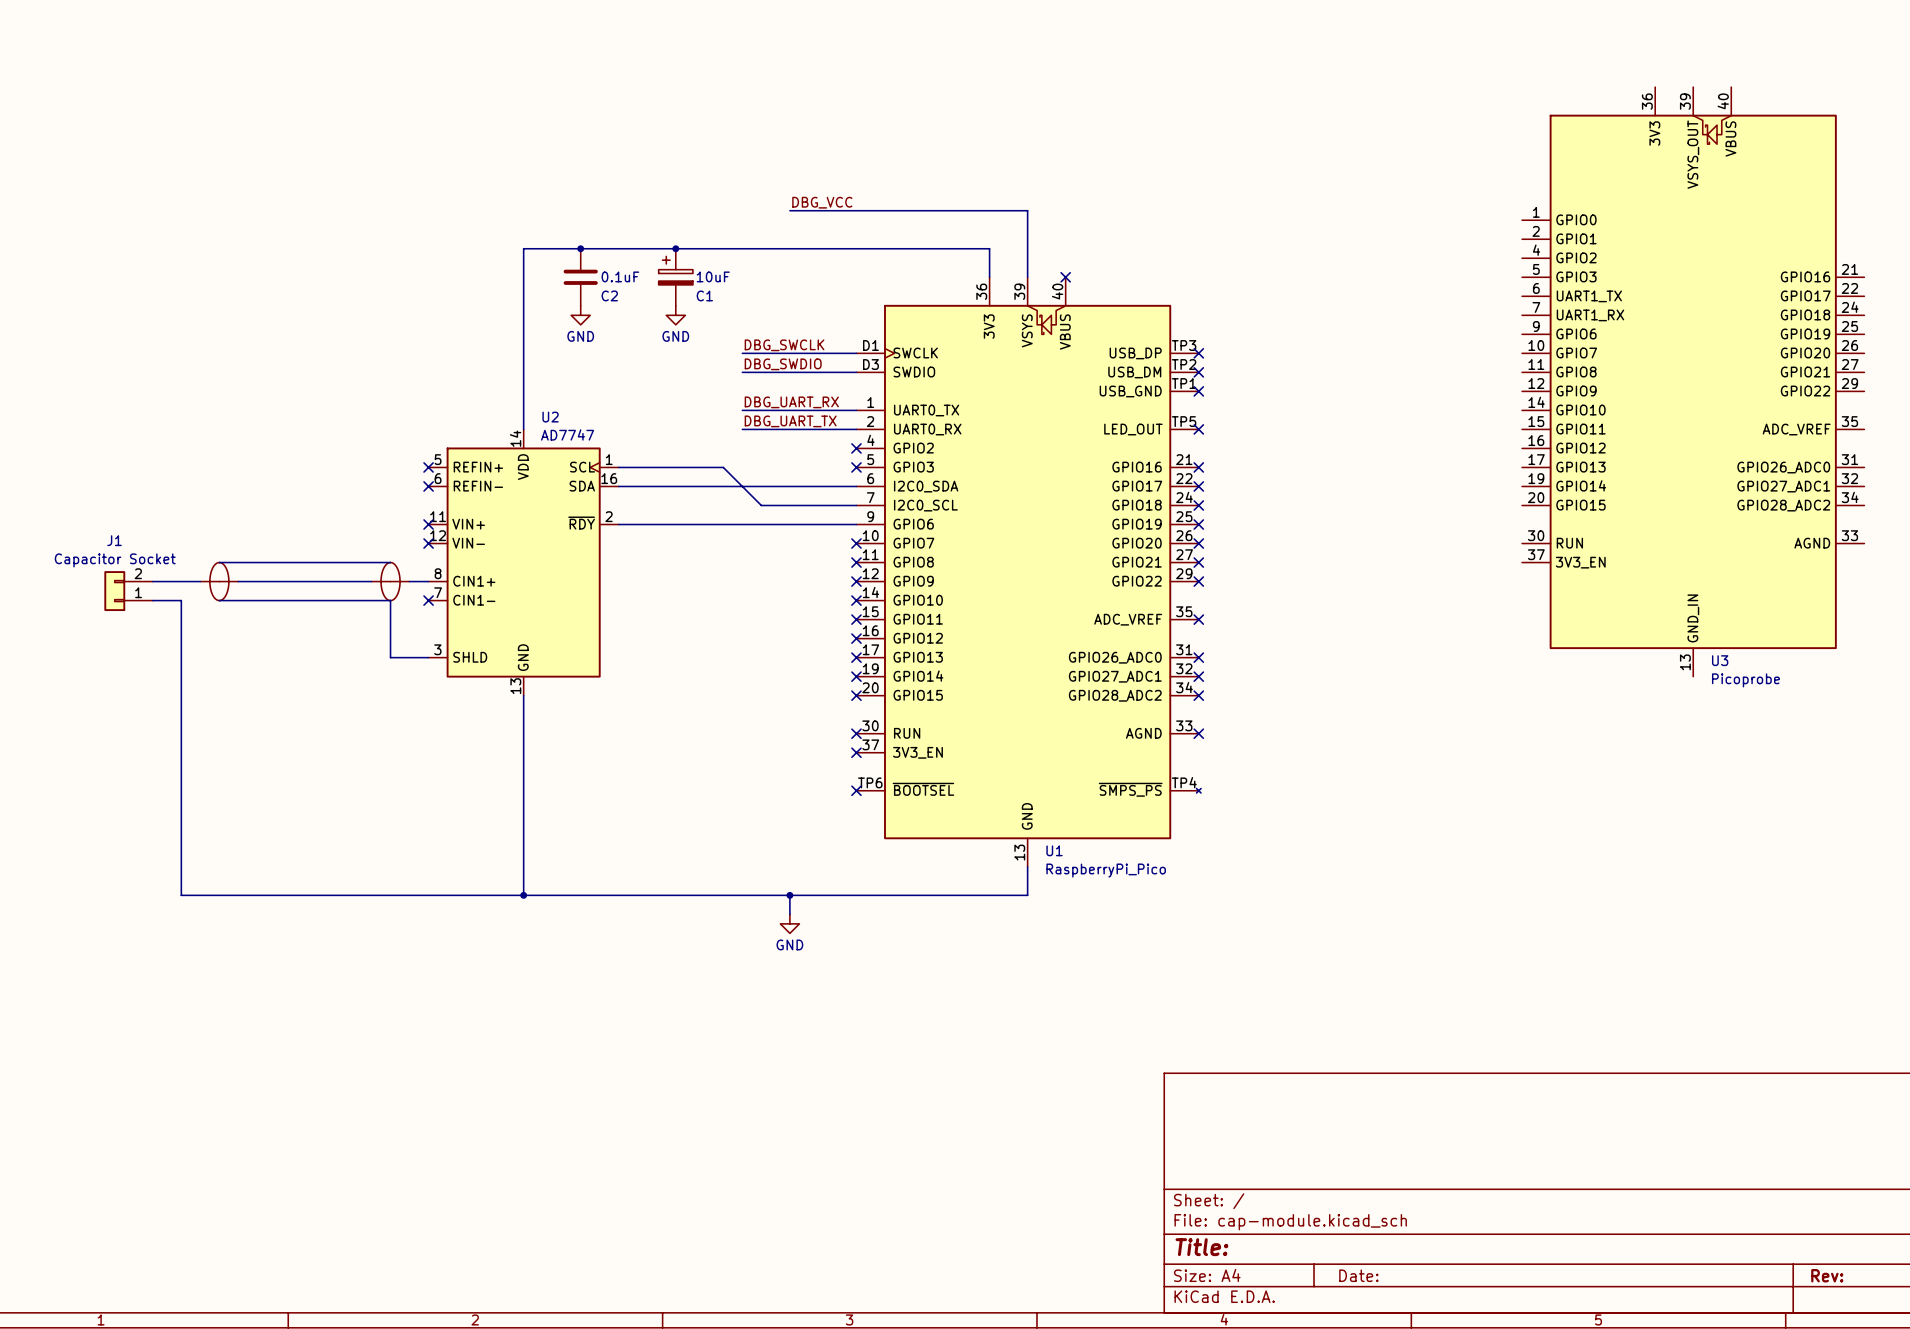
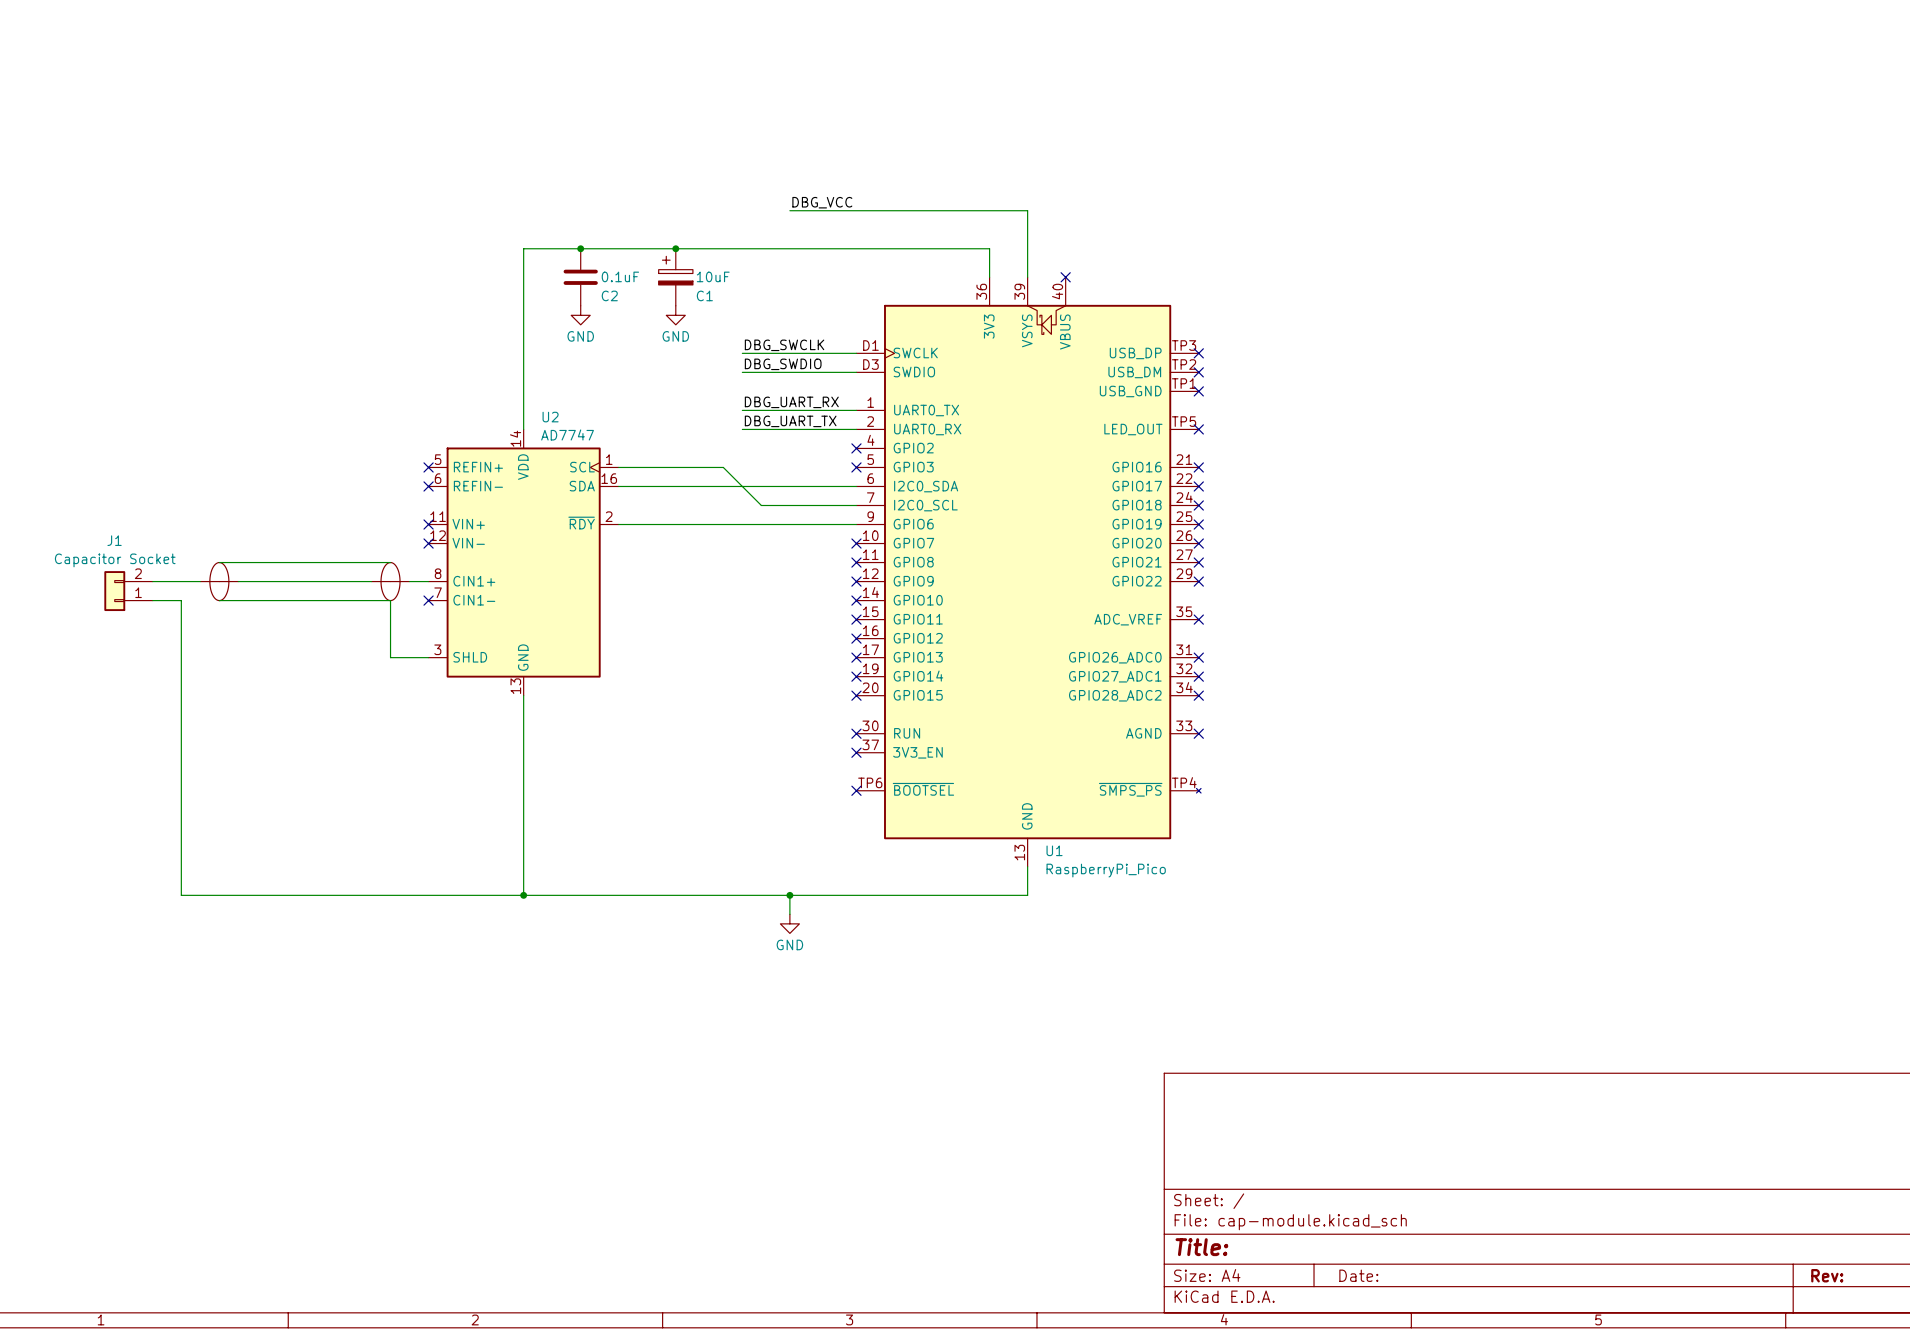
U3: Picoprobe (1693, 381) -> none

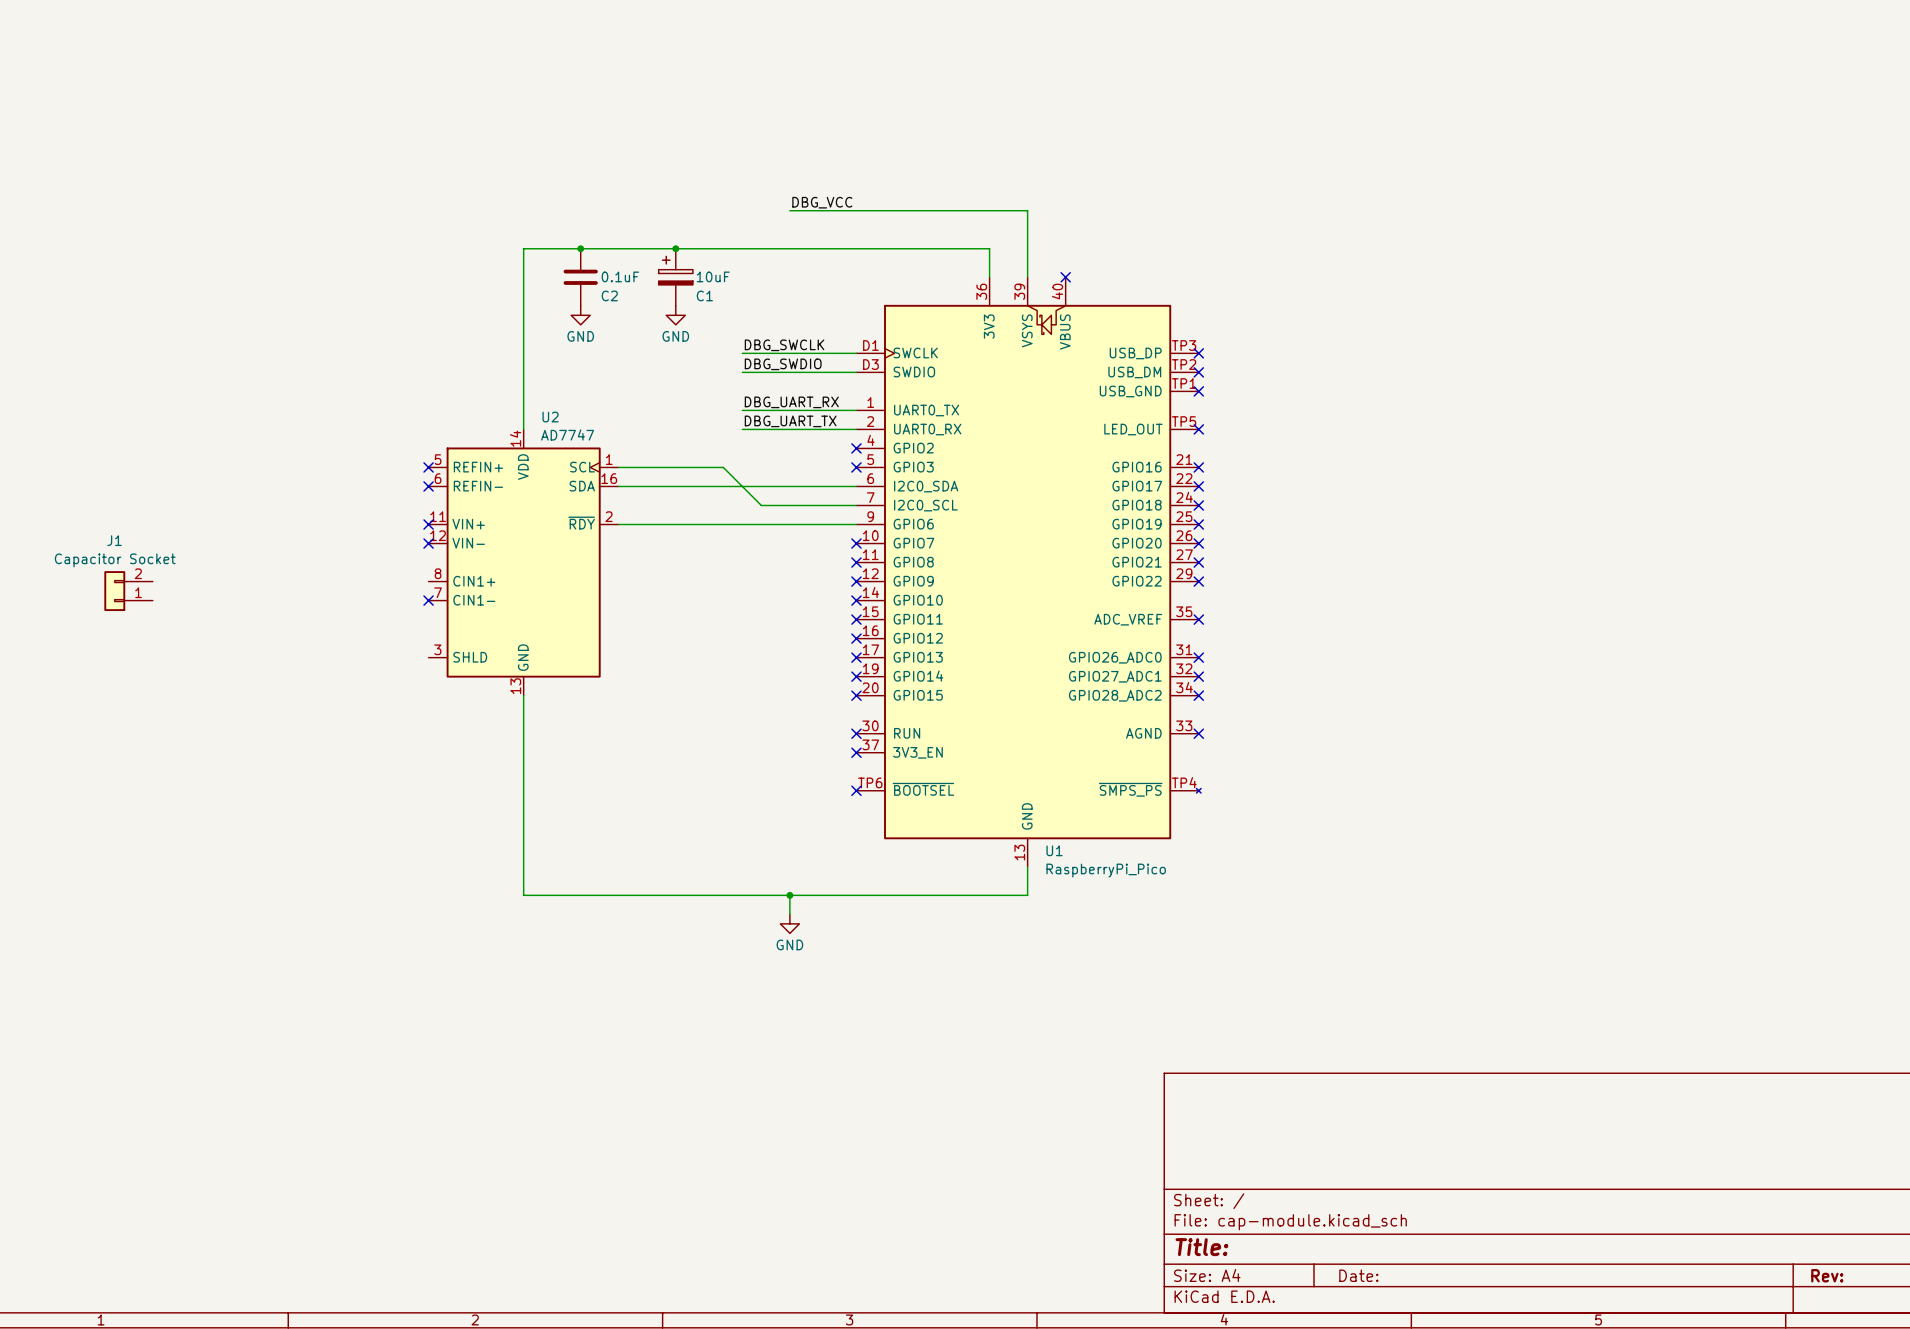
wire: (219, 562) (390, 562) -> none
wire: (152, 581) (200, 581) -> none
part: (219, 581) -> none
wire: (238, 581) (371, 581) -> none
part: (390, 581) -> none
wire: (409, 581) (428, 581) -> none
wire: (152, 600) (181, 600) (181, 895) (523, 895) -> none
wire: (219, 600) (390, 600) (390, 657) (428, 657) -> none
junction: (523, 895) -> none

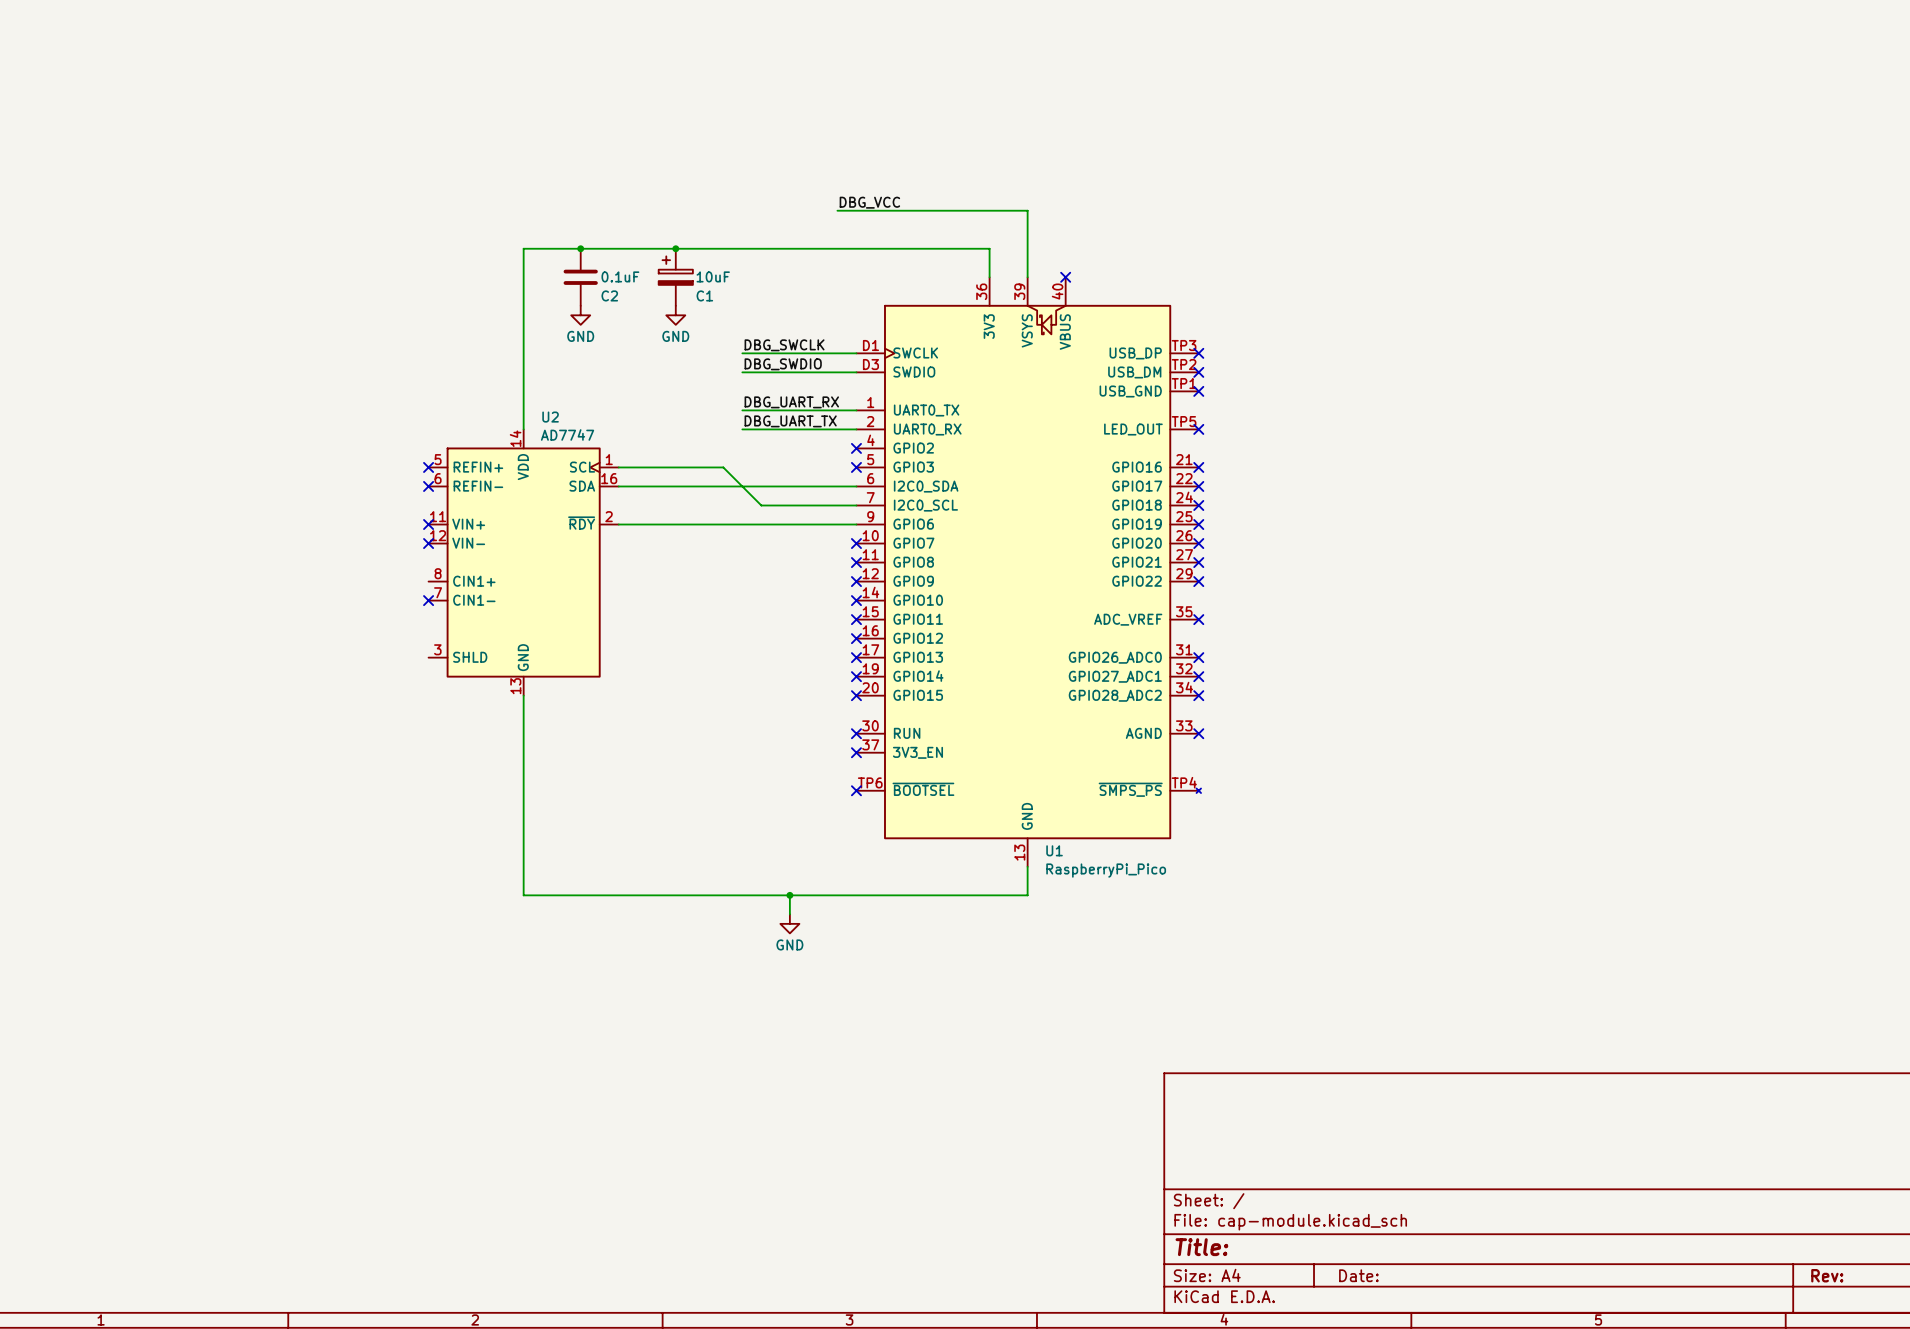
label position: DBG_VCC (822, 202) -> DBG_VCC (869, 202)
wire: (789, 210) (837, 210) -> none
J1: Capacitor Socket (128, 591) -> none

